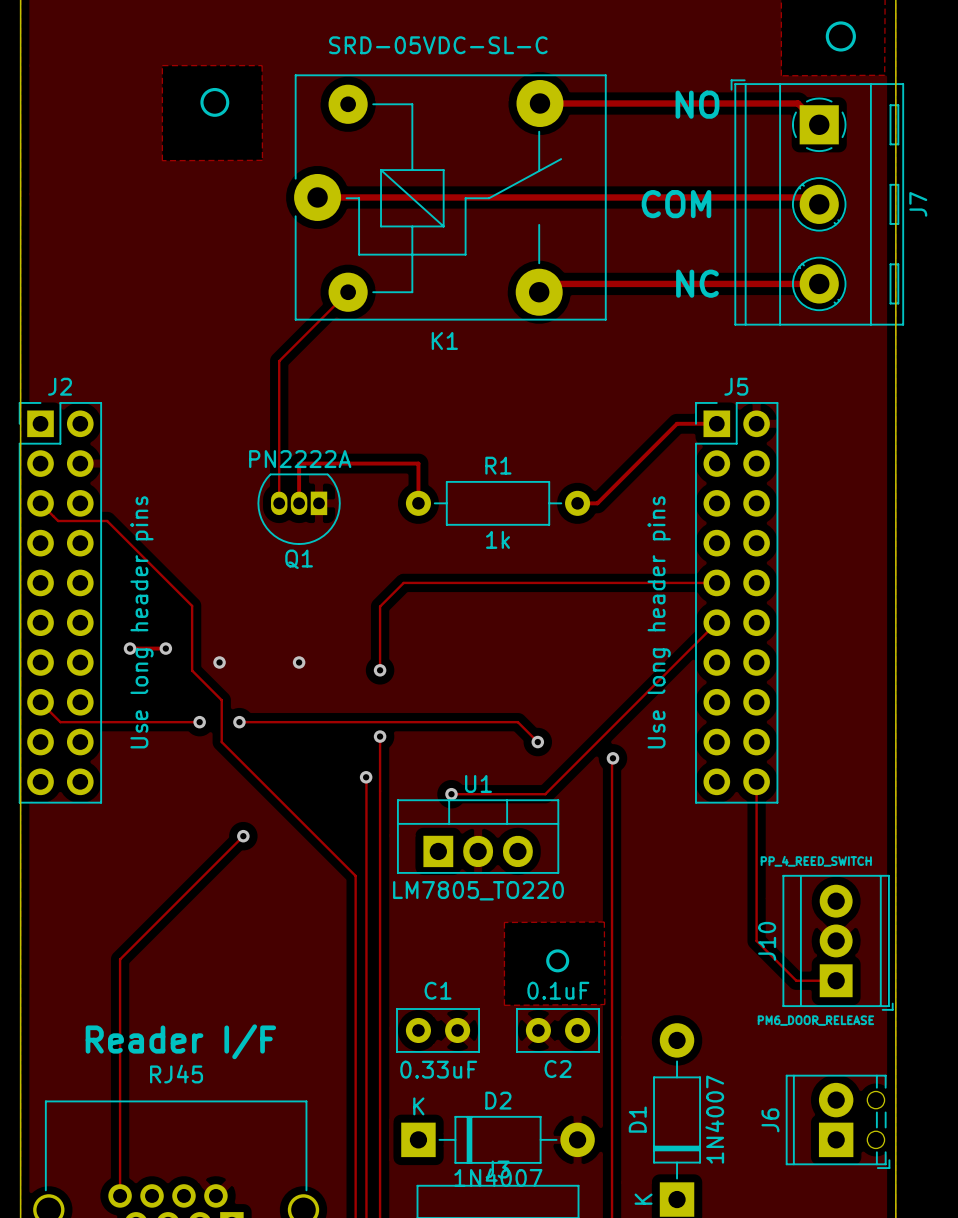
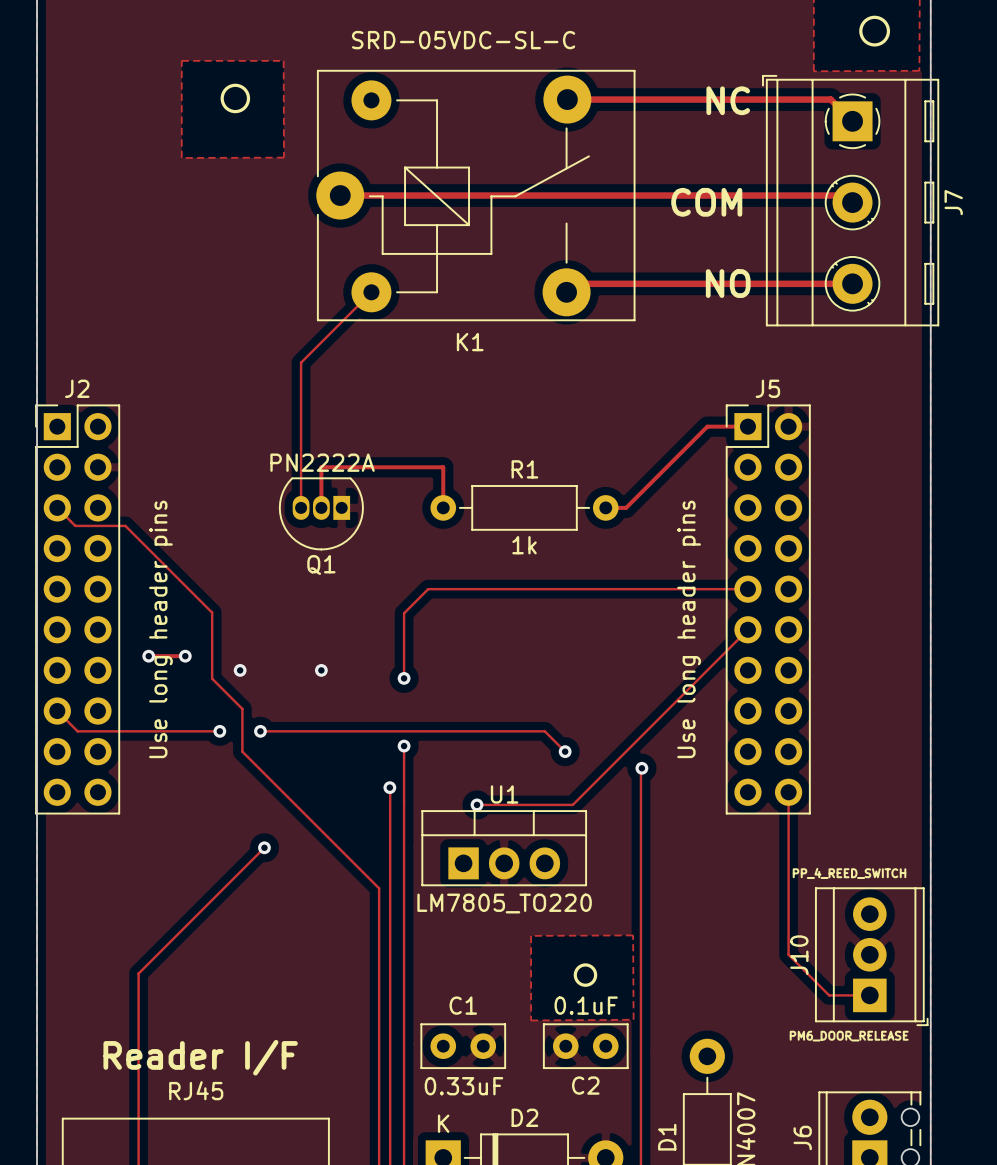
text: NO (697, 104) -> NC (728, 100)
text: NC (697, 283) -> NO (728, 283)

